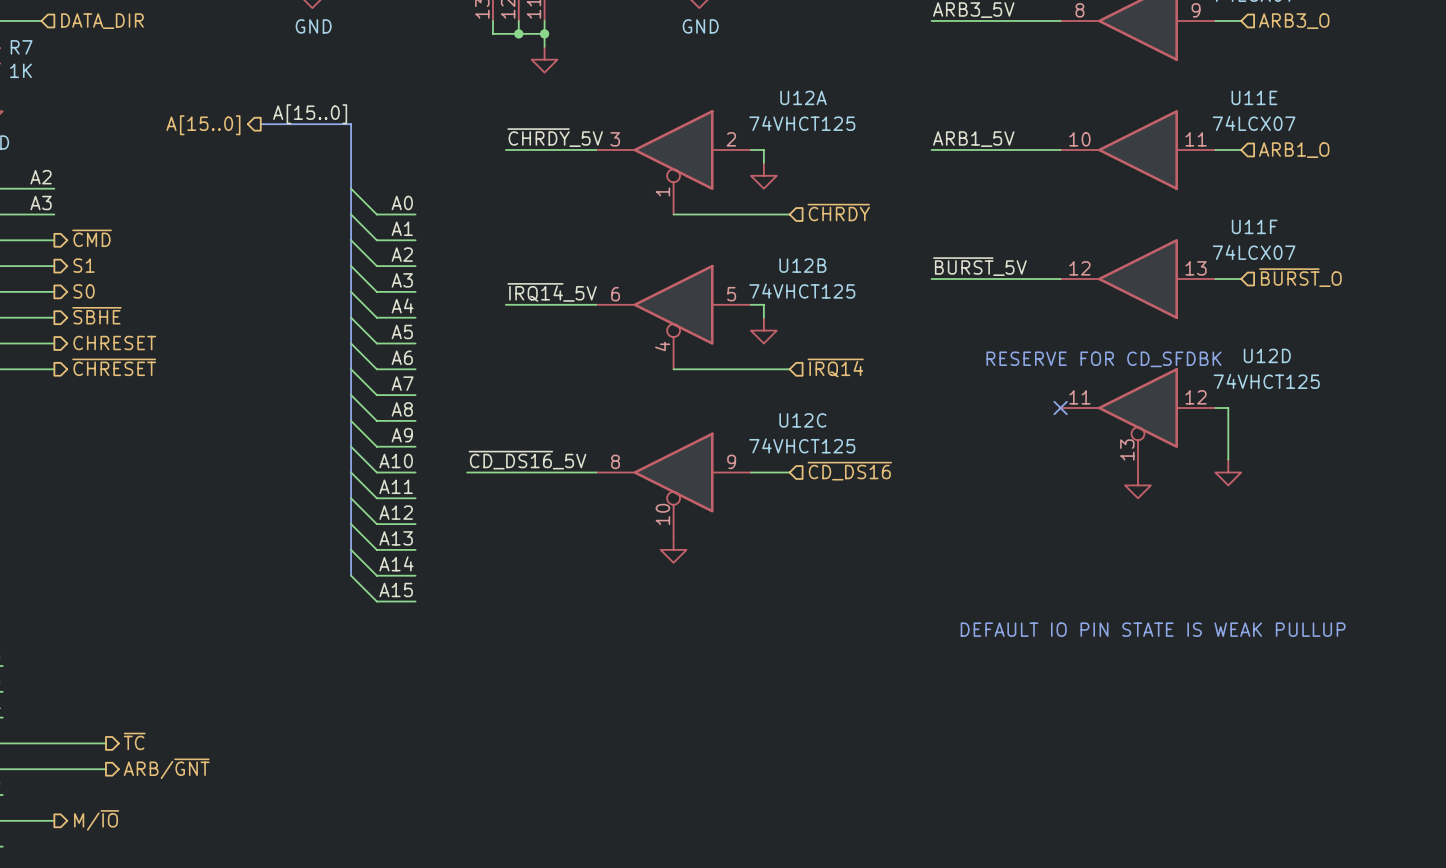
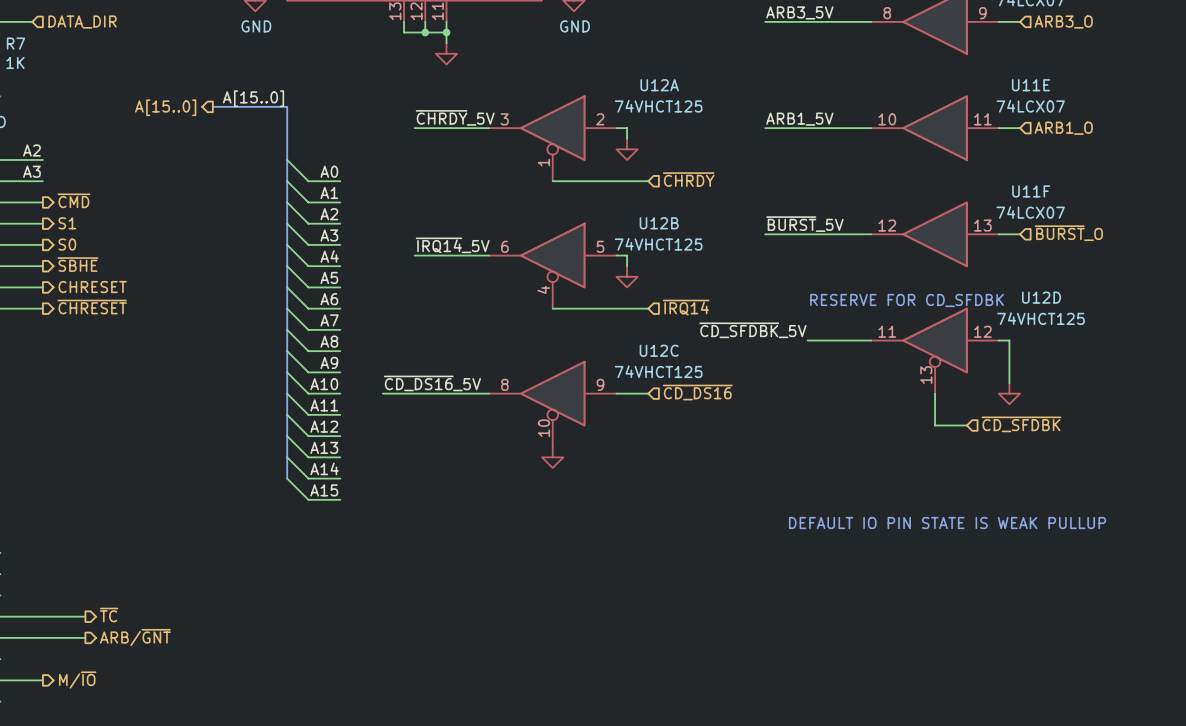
label: none -> ~{CD_SFDBK}_5V (752, 330)
wire: none -> (807, 340) (871, 340)
no-connect mark: (1060, 408) -> none
wire: none -> (935, 393) (935, 425) (966, 425)
power symbol: (1138, 485) -> none
hierarchical label: none -> ~{CD_SFDBK} (1021, 424)

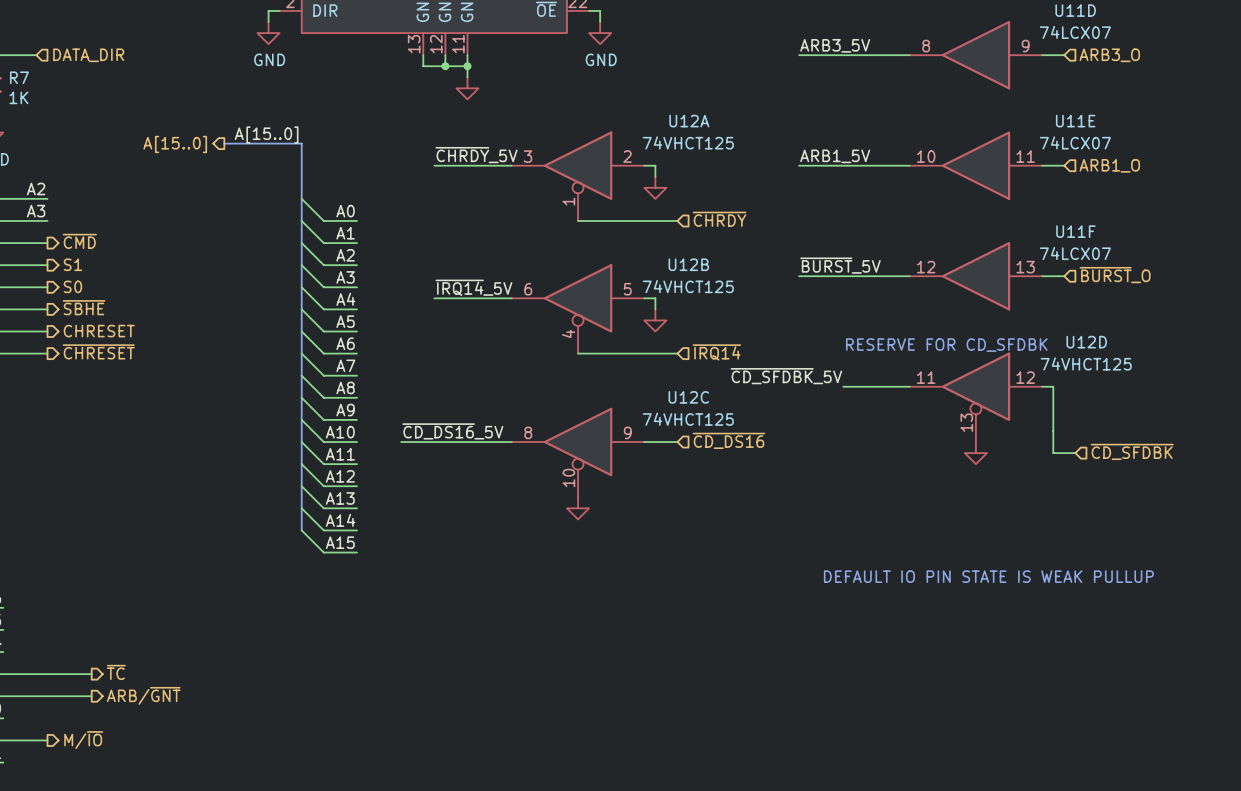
wire: none -> (1053, 430) (1053, 453) (1075, 453)
wire: (935, 393) (935, 425) (966, 425) -> none
power symbol position: (1009, 393) -> (975, 453)
hierarchical label position: ~{CD_SFDBK} (1021, 424) -> ~{CD_SFDBK} (1132, 451)

